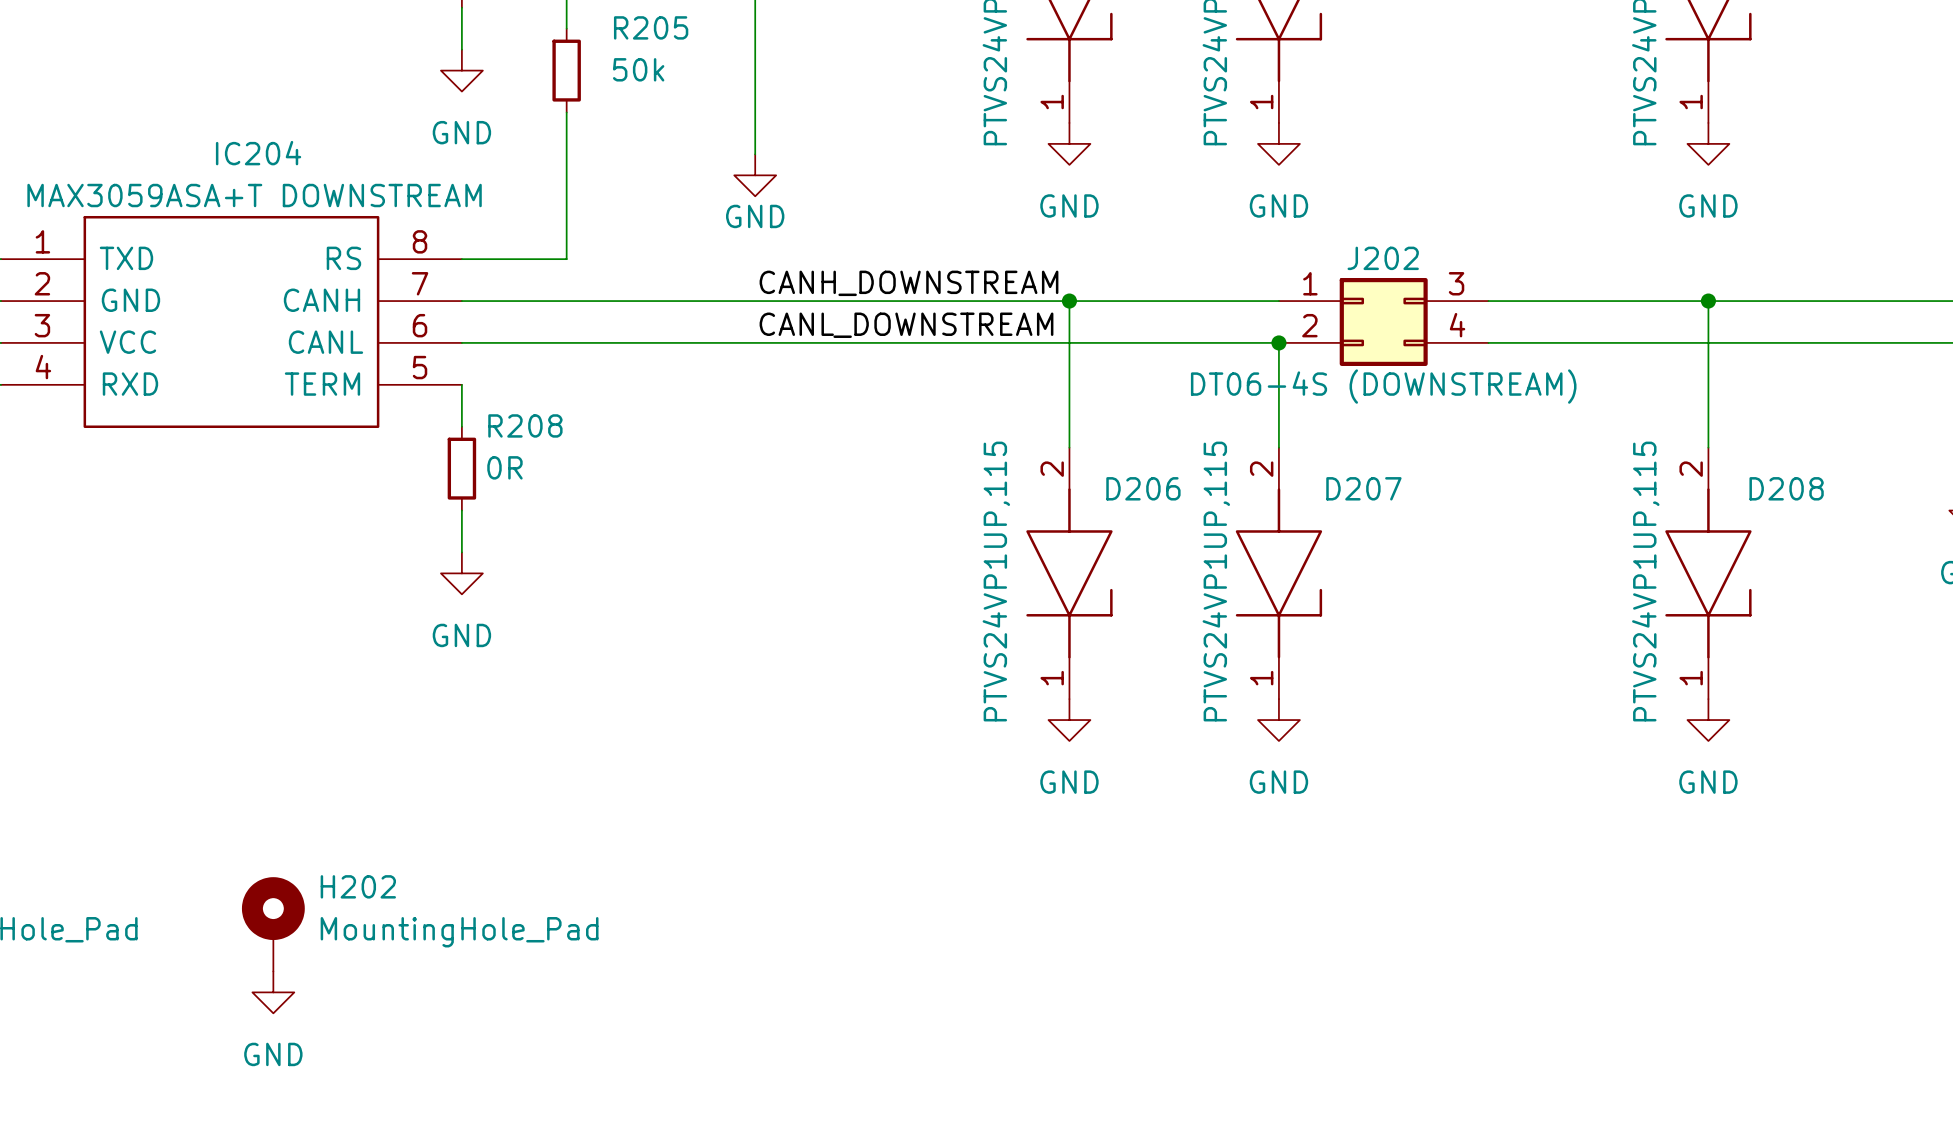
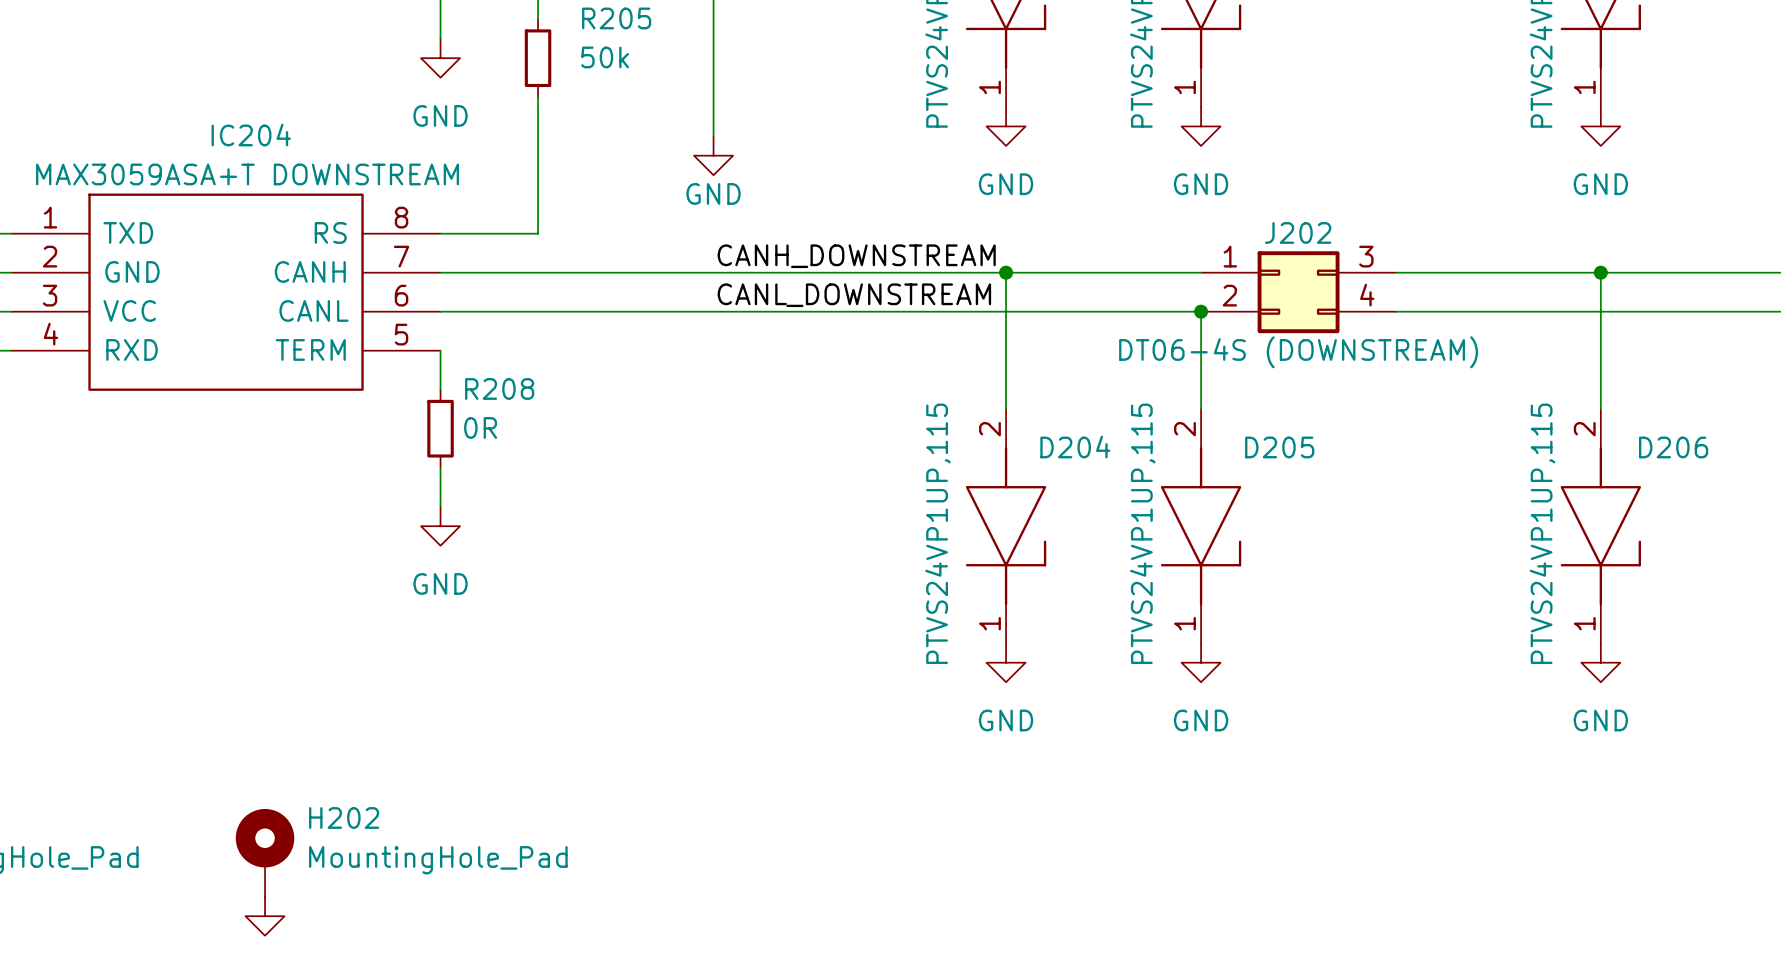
D206 name: D206 (1143, 488) -> D204 (1075, 447)
D207 name: D207 (1363, 488) -> D205 (1279, 447)
D208 name: D208 (1786, 488) -> D206 (1673, 447)

